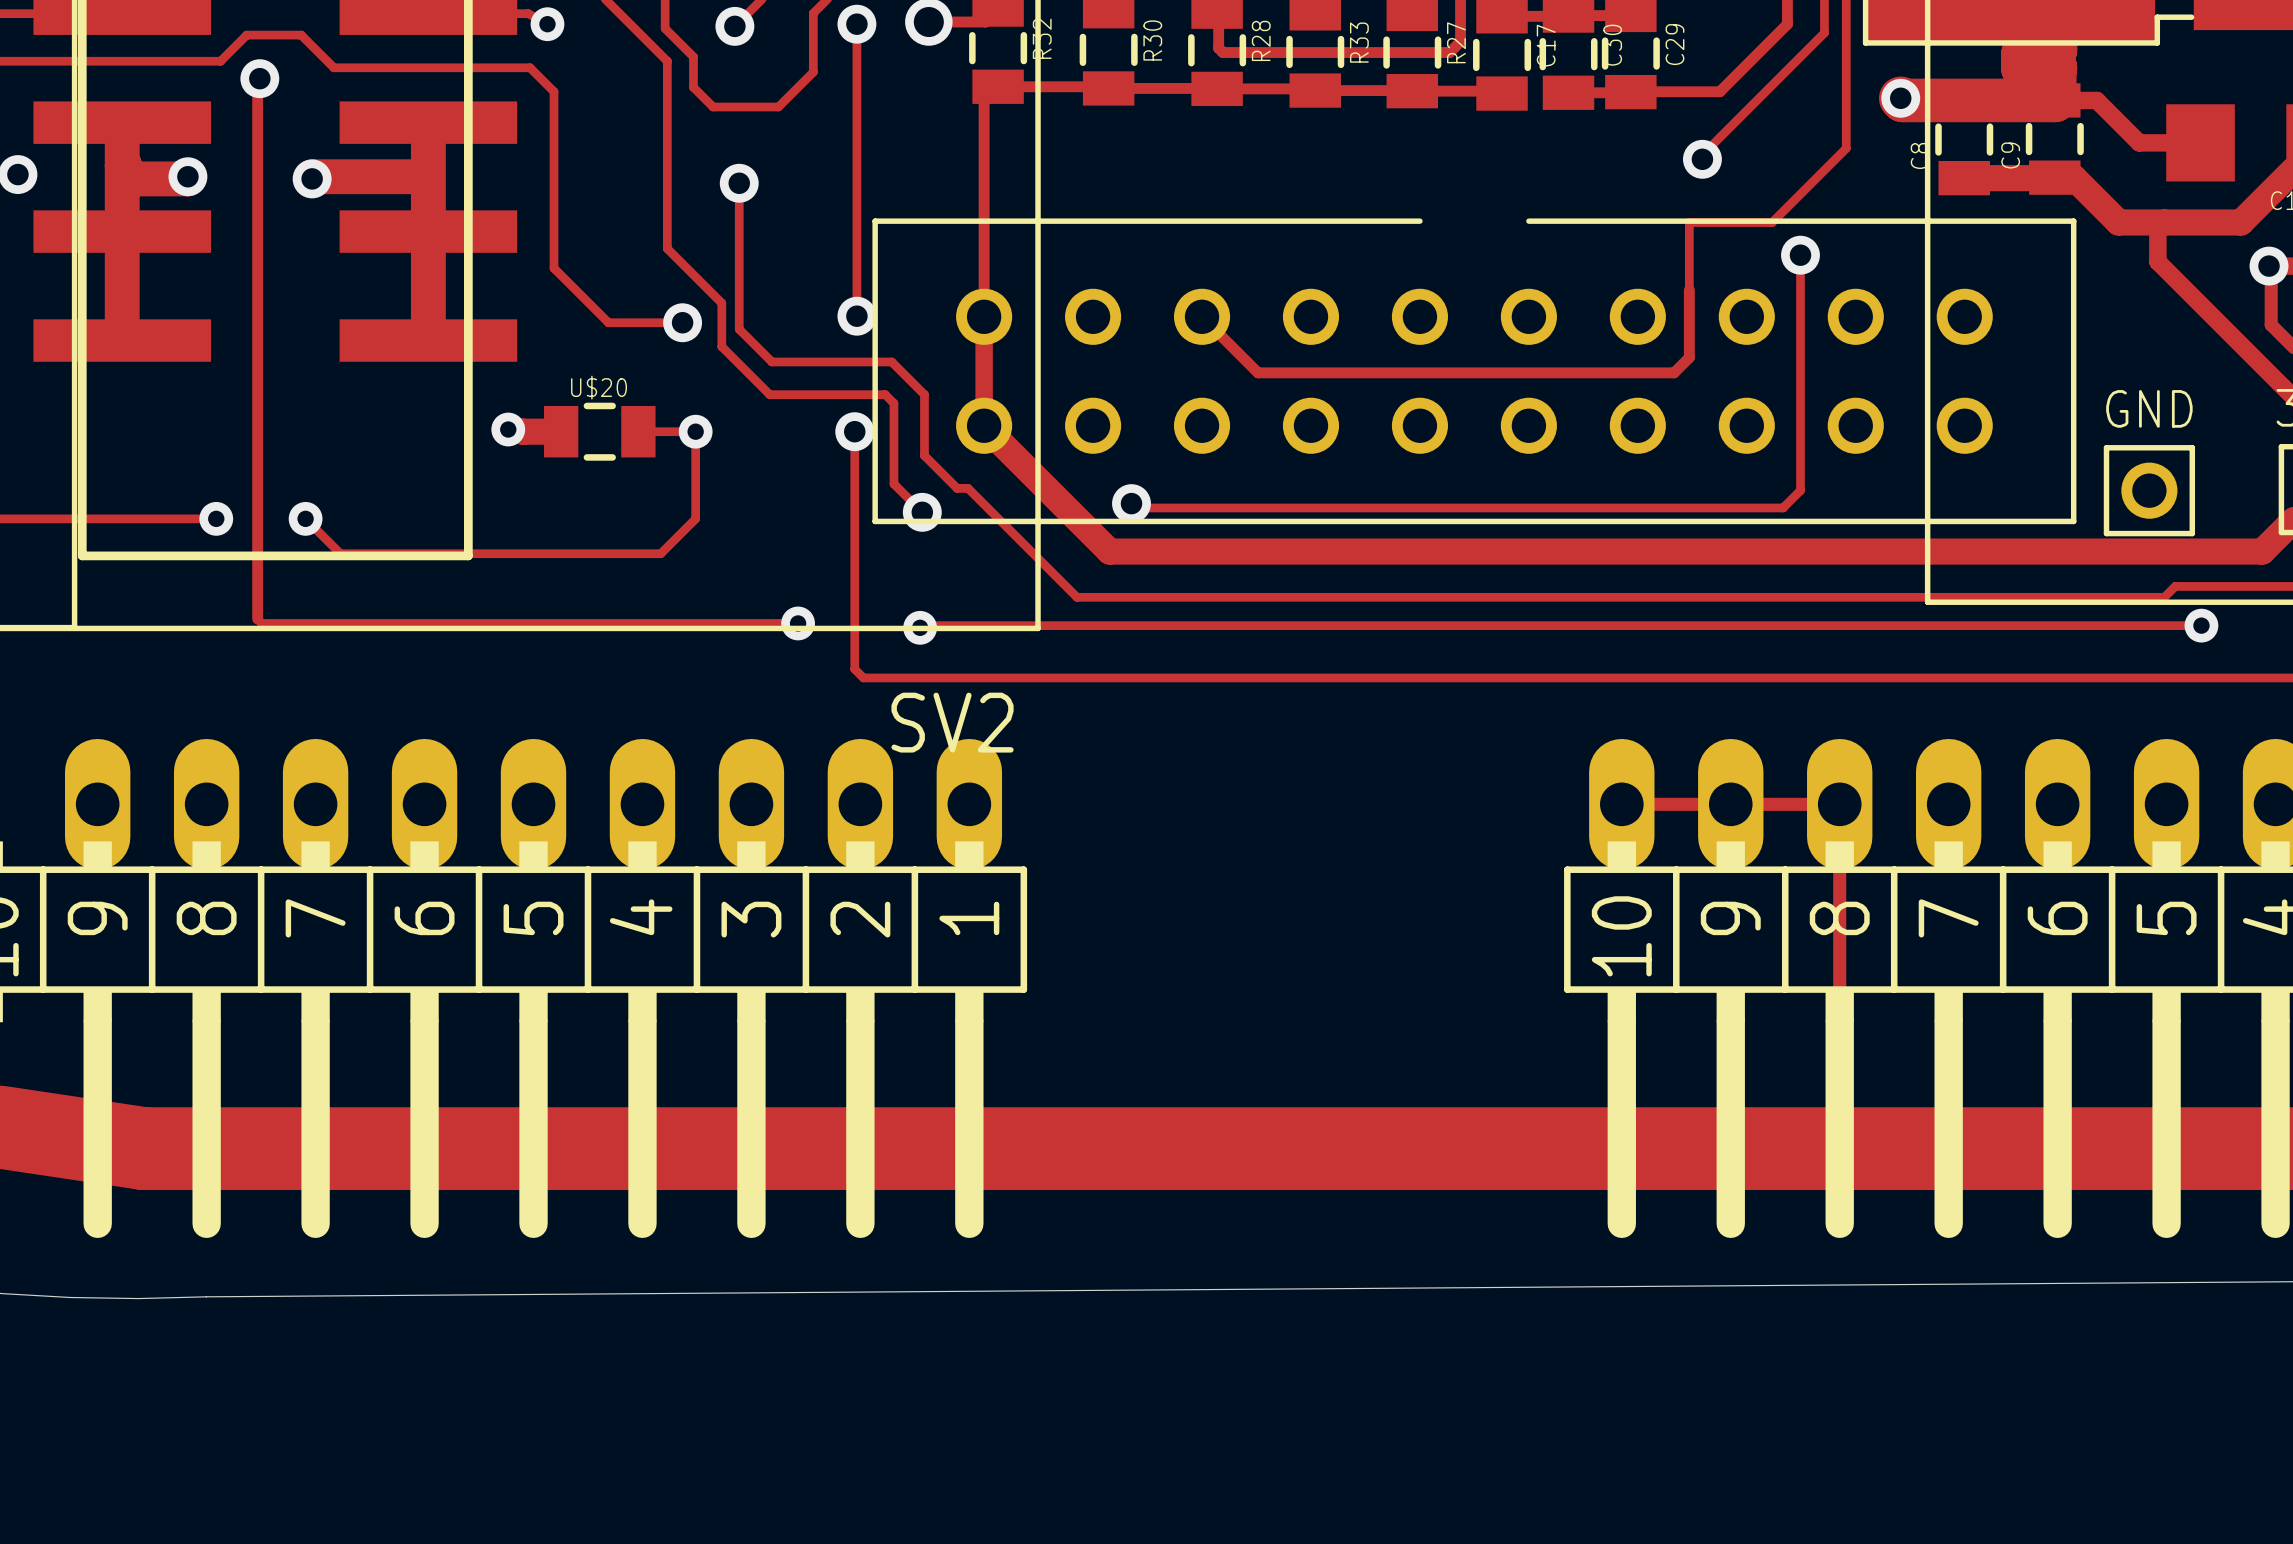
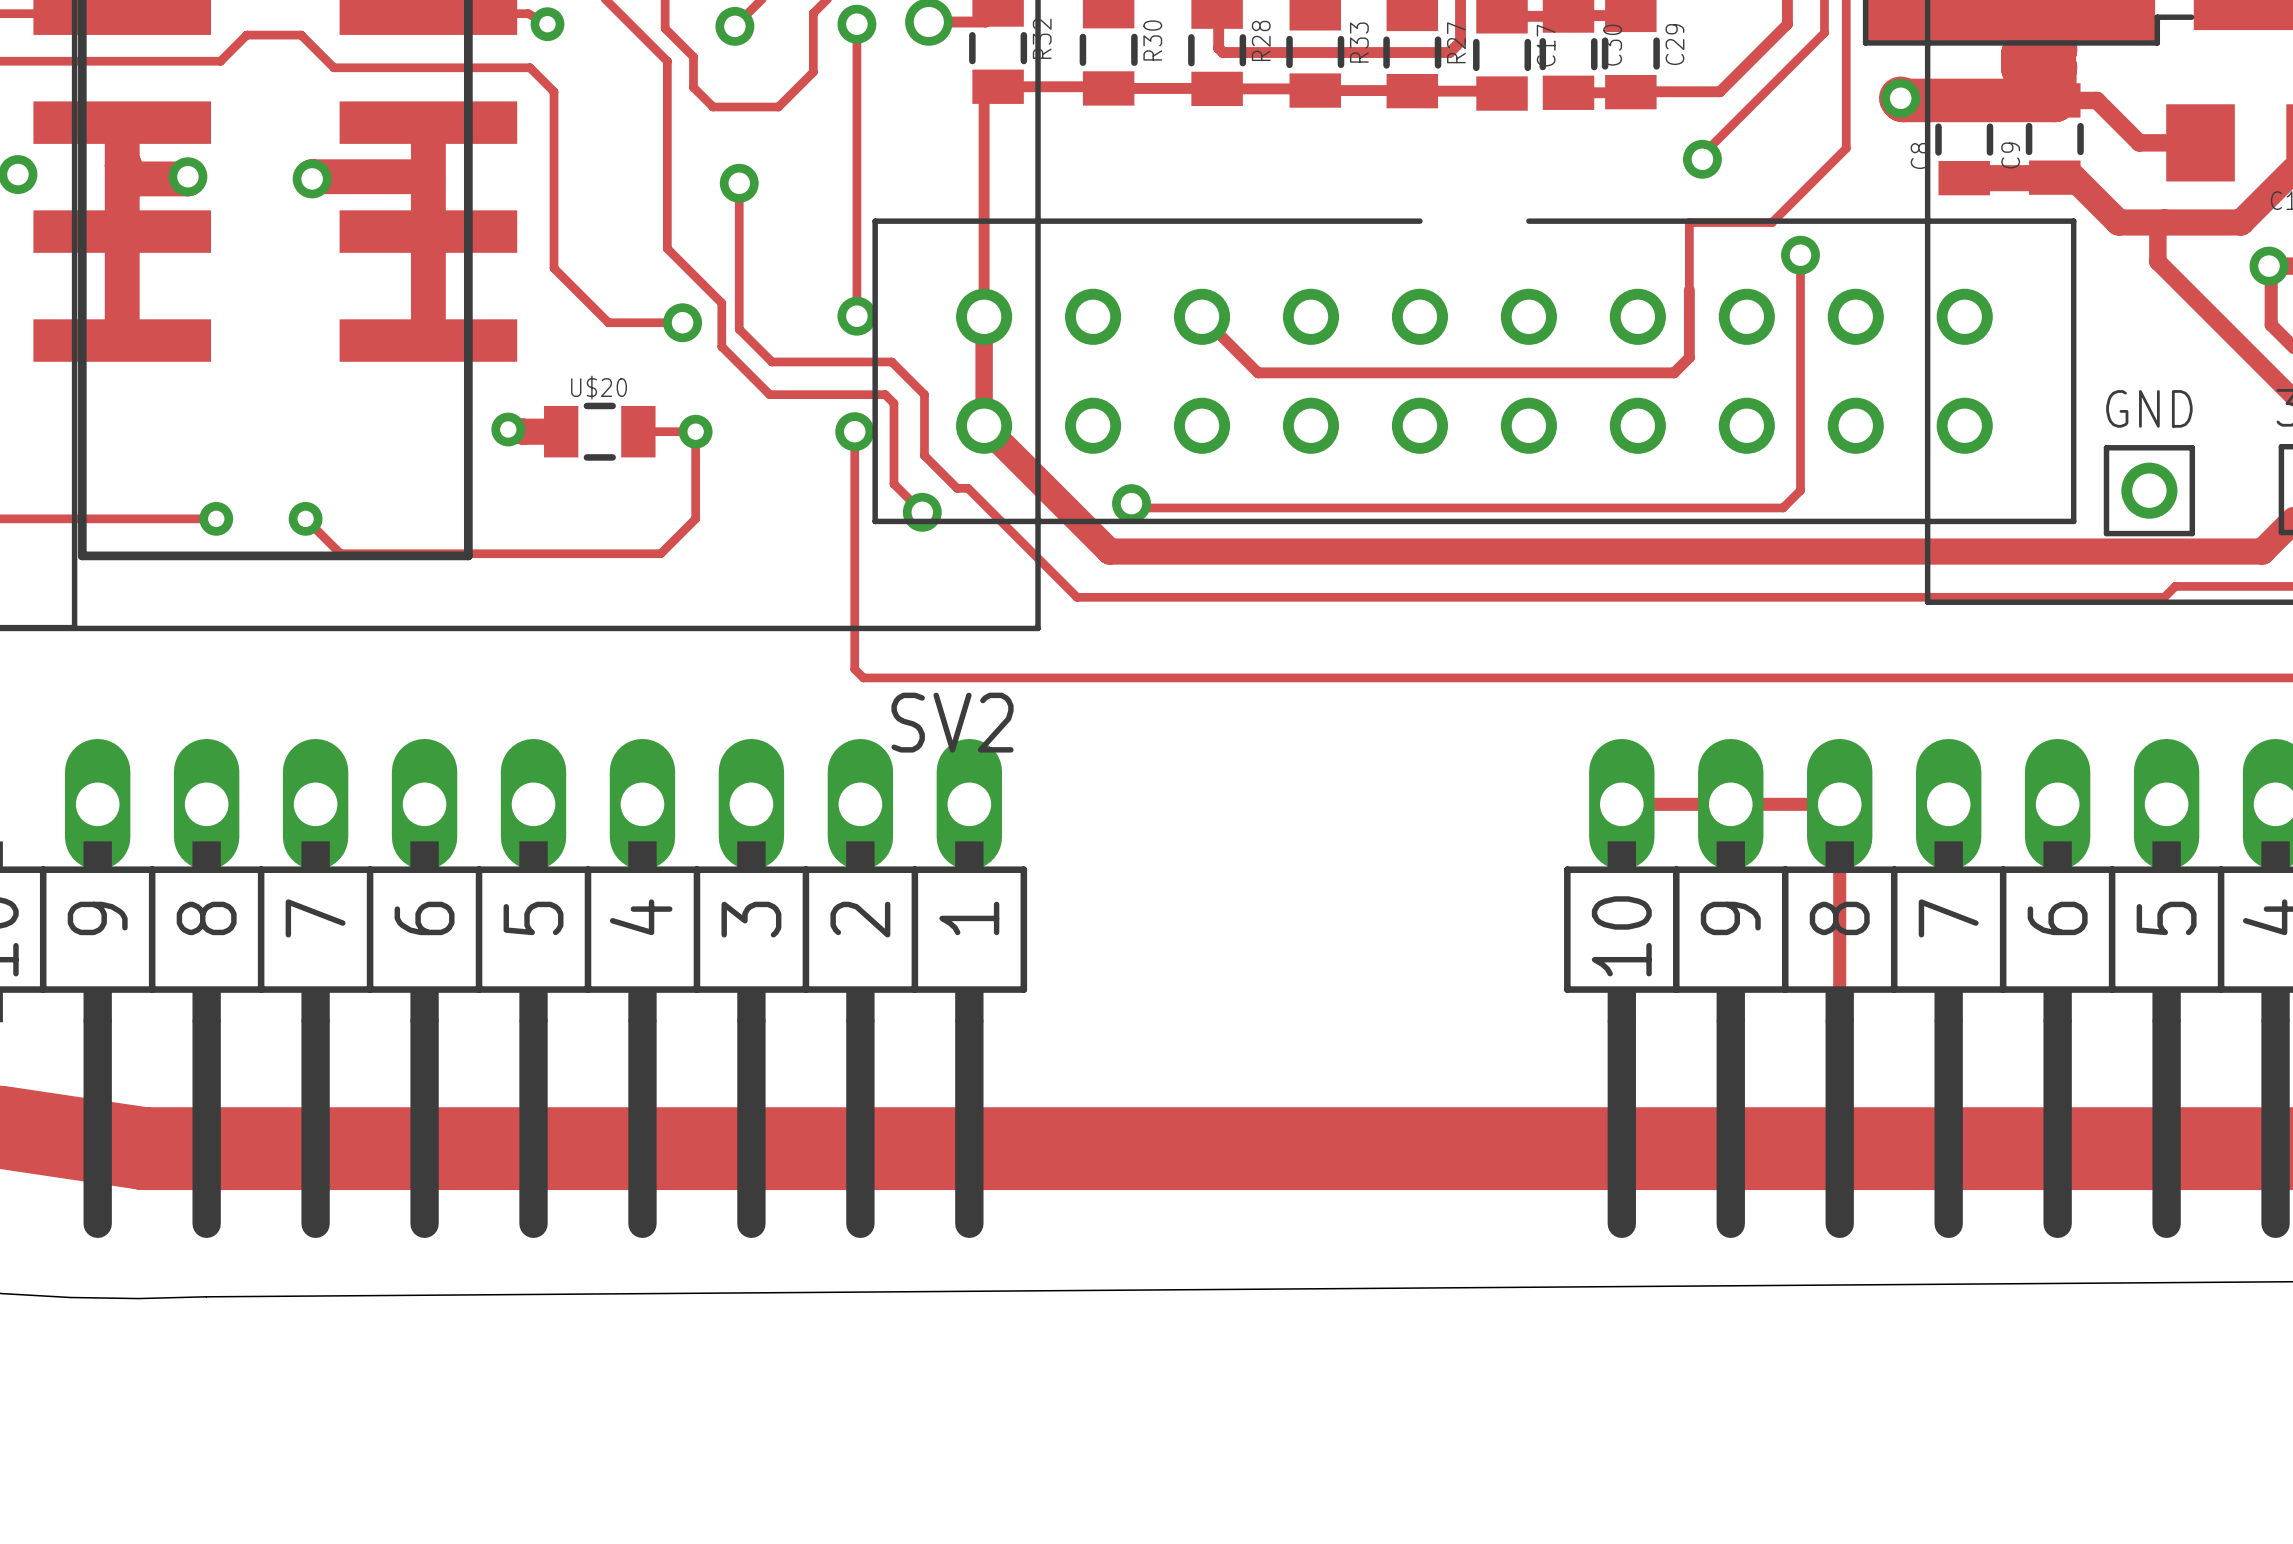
track: (259, 78) (257, 80) (257, 619) (262, 623) (798, 623) -> none
via: (259, 78) -> none
via: (798, 623) -> none
track: (2201, 625) (922, 625) (920, 627) -> none
via: (2201, 625) -> none
via: (920, 627) -> none

